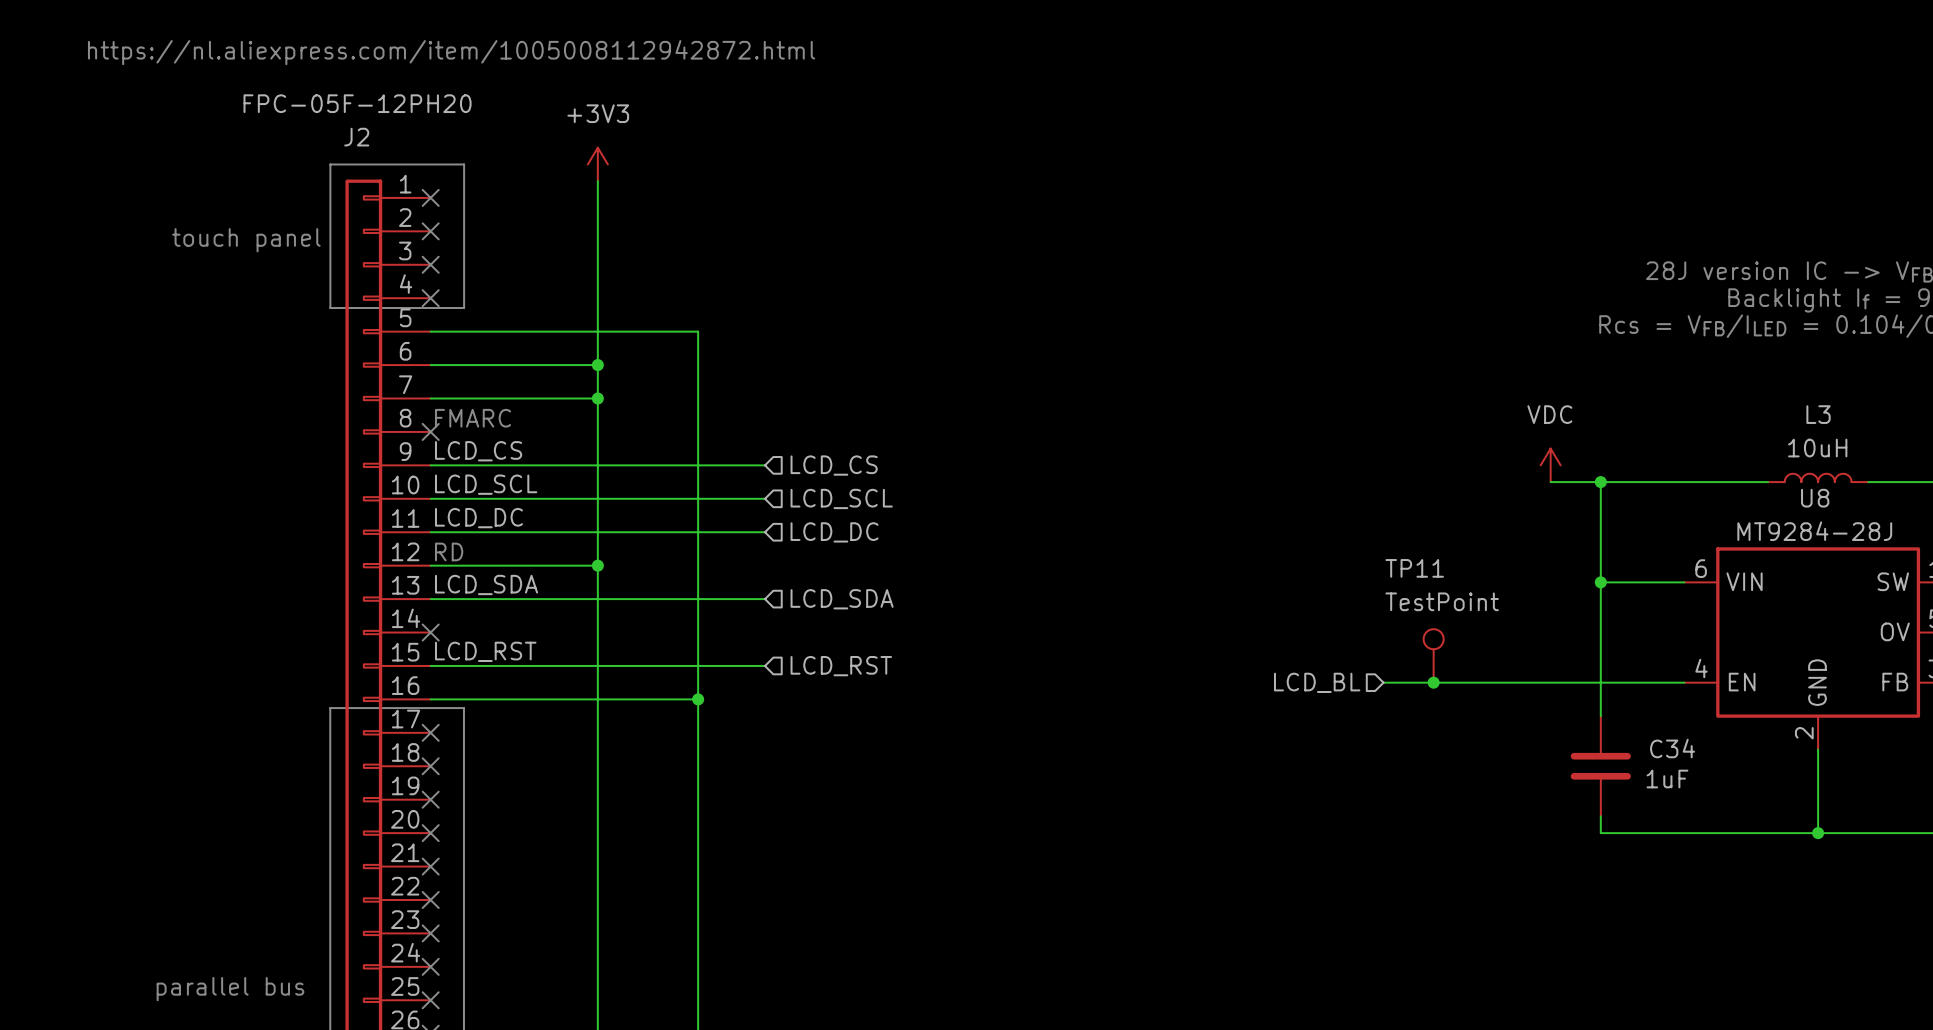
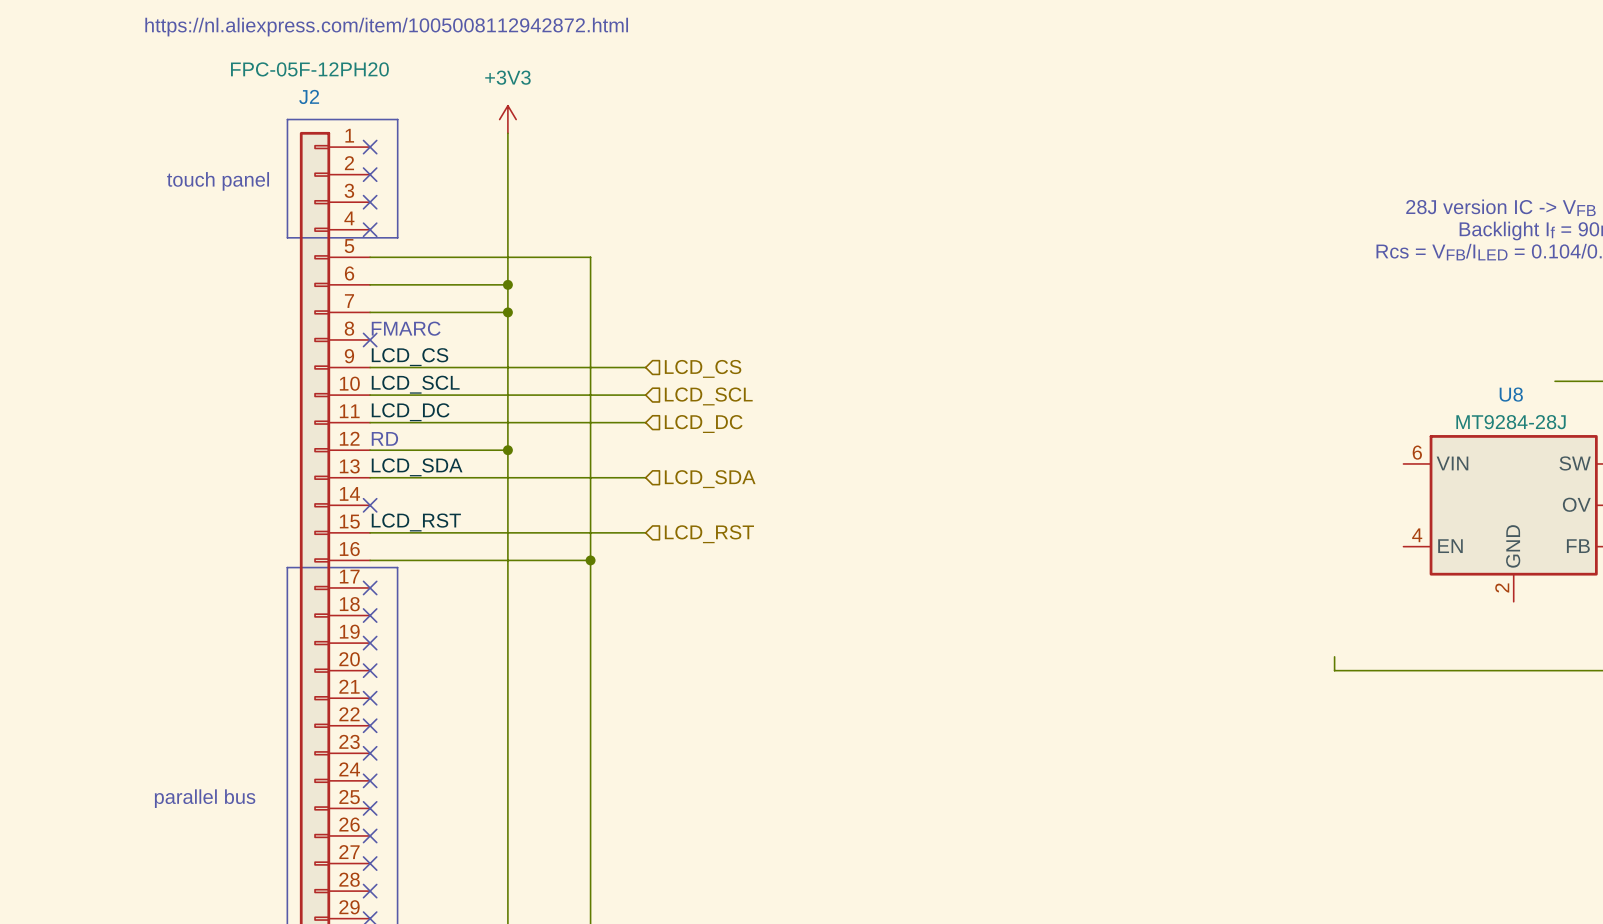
power symbol: VDC (1550, 465) -> none
L3: 10uH (1818, 477) -> none
wire: (1550, 482) (1767, 482) -> none
wire: (1600, 482) (1600, 716) -> none
junction: (1600, 482) -> none
wire: (1600, 582) (1684, 582) -> none
junction: (1600, 582) -> none
TP11: TestPoint (1433, 655) -> none
hierarchical label: LCD_BL (1317, 682) -> none
wire: (1383, 682) (1684, 682) -> none
junction: (1433, 682) -> none
wire: (1818, 749) (1818, 833) -> none
C34: 1uF (1600, 766) -> none
junction: (1818, 833) -> none

